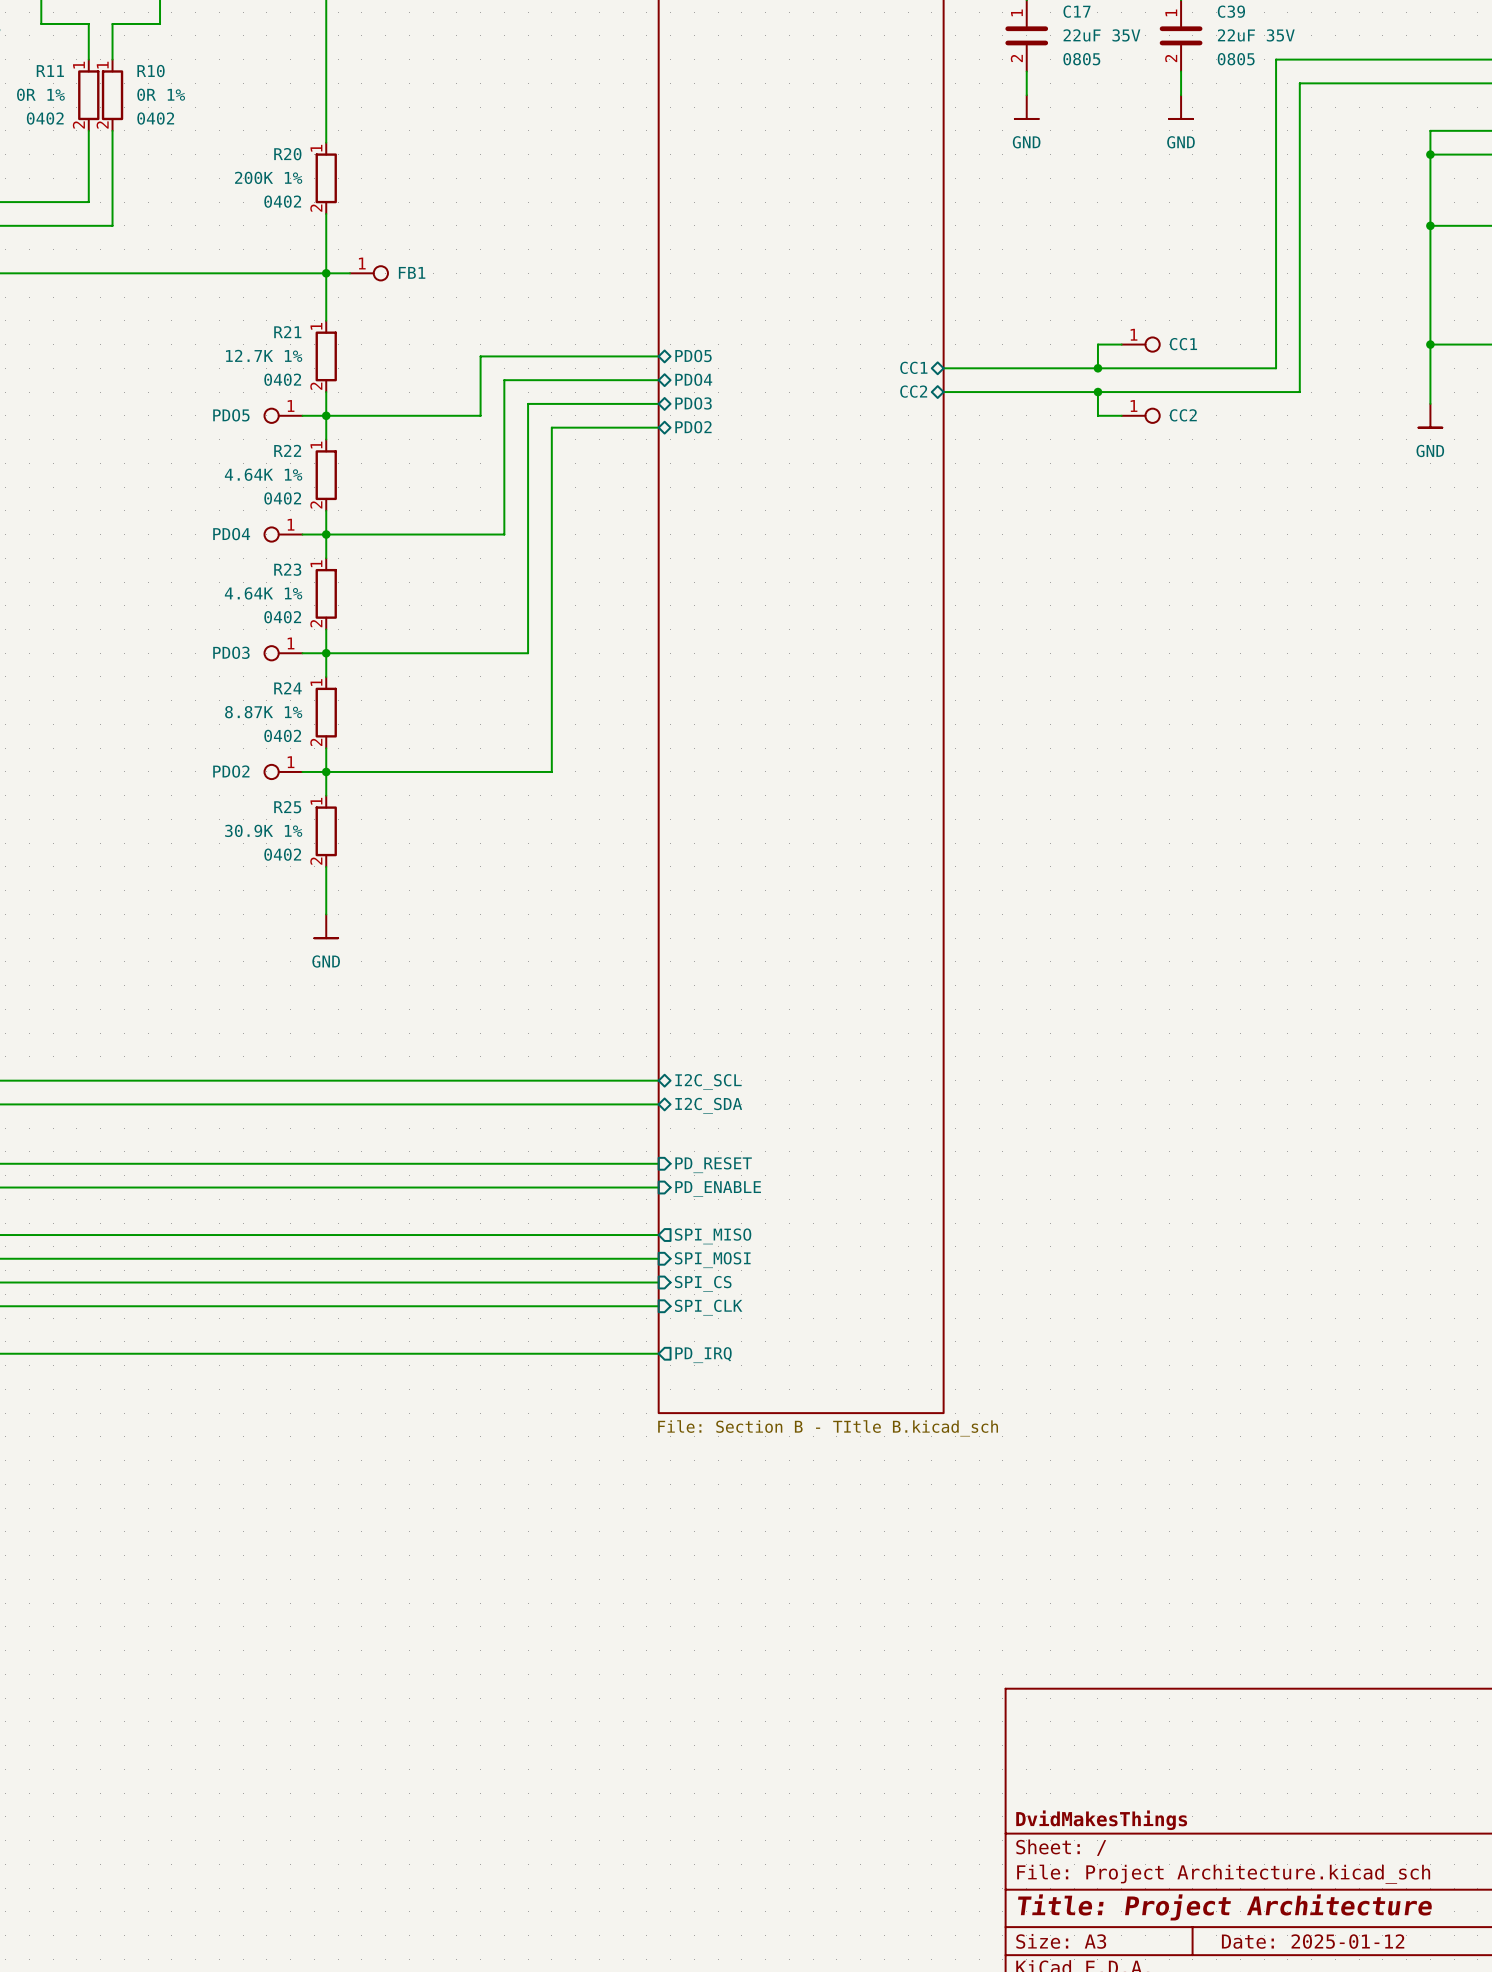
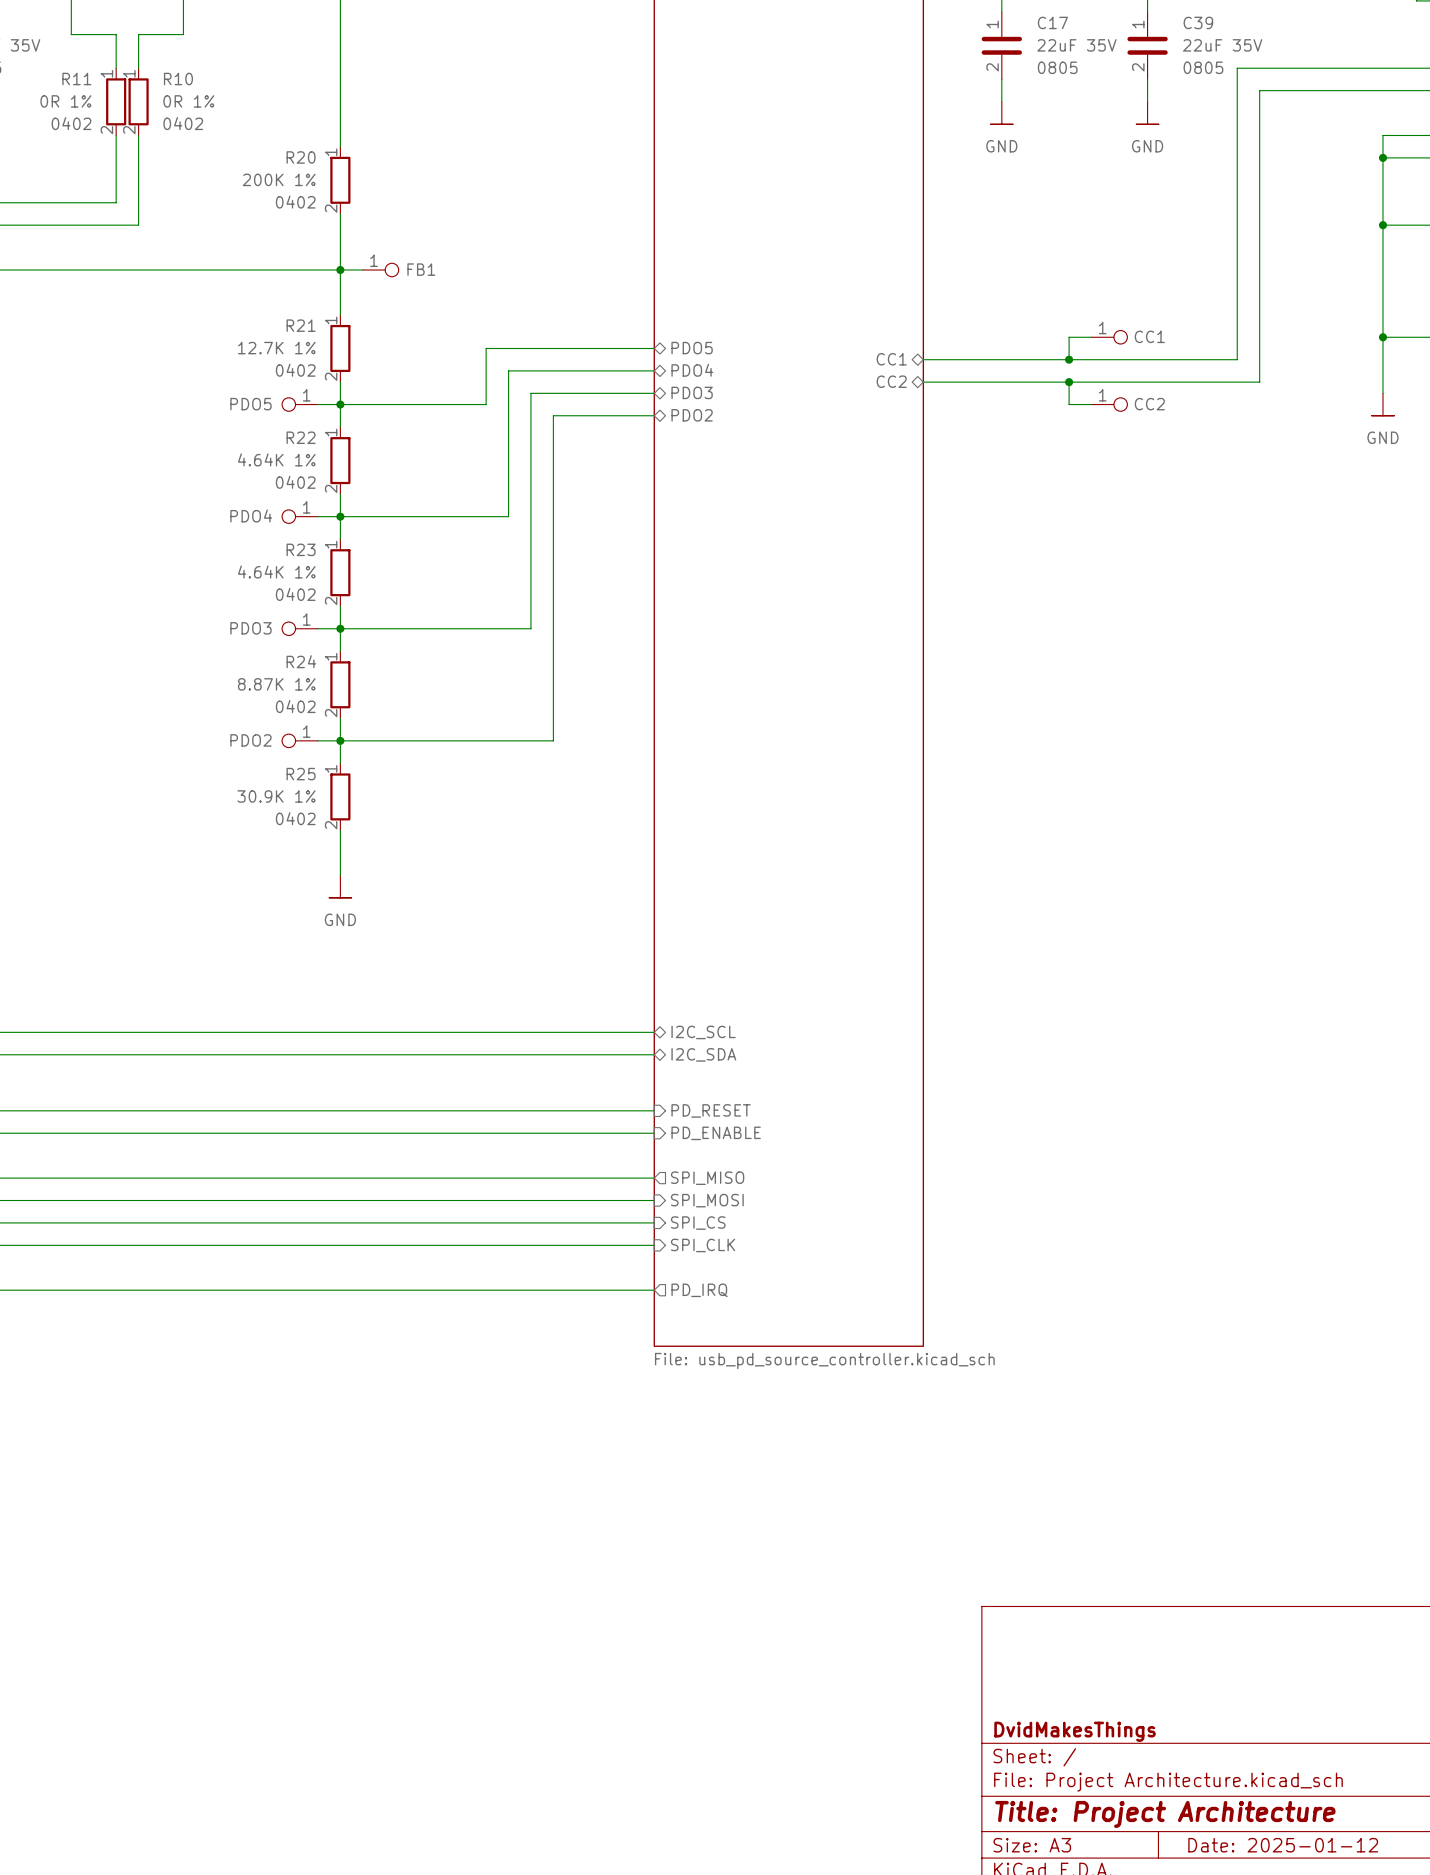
sheet value: File: Section B - TItle B.kicad_sch (828, 1428) -> File: usb_pd_source_controller.kicad_sch (824, 1360)

